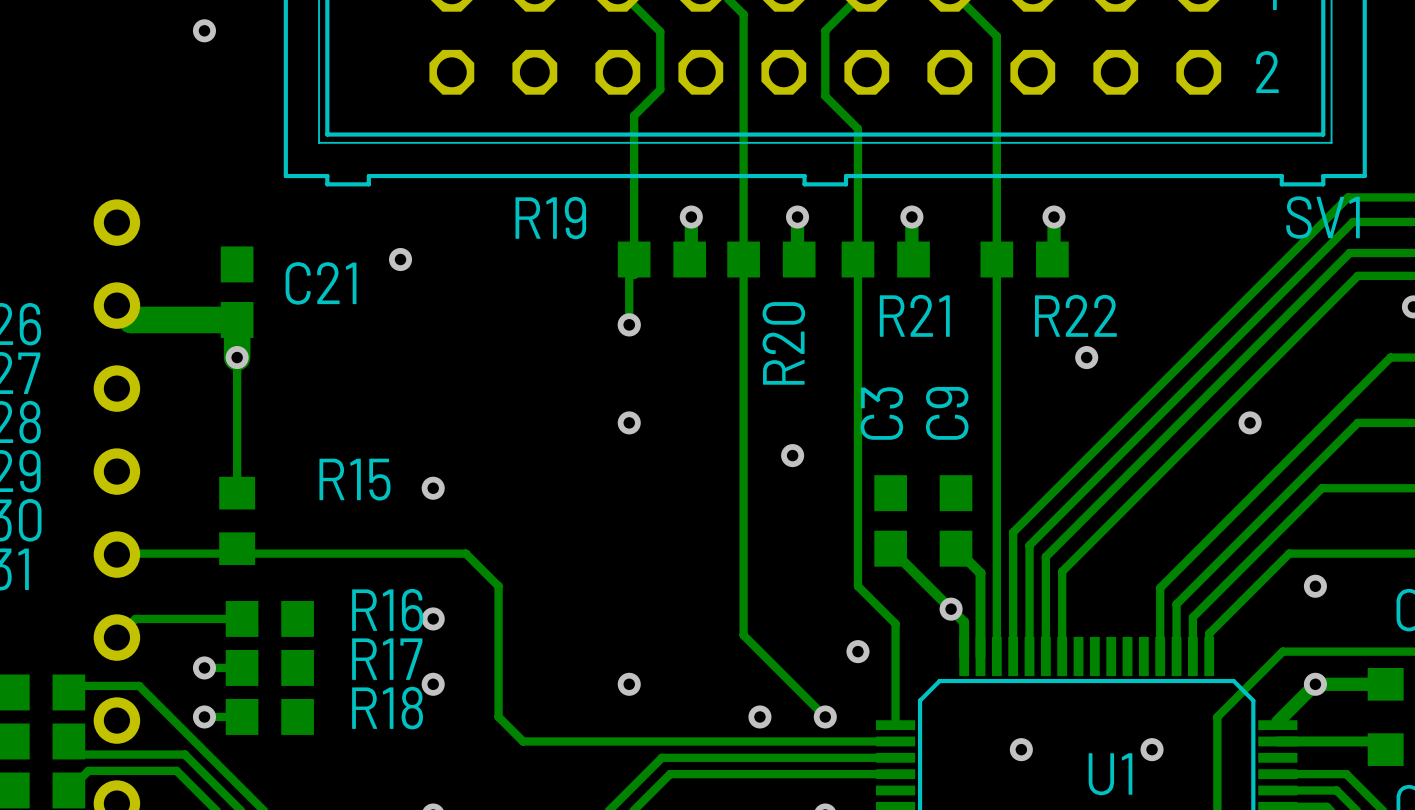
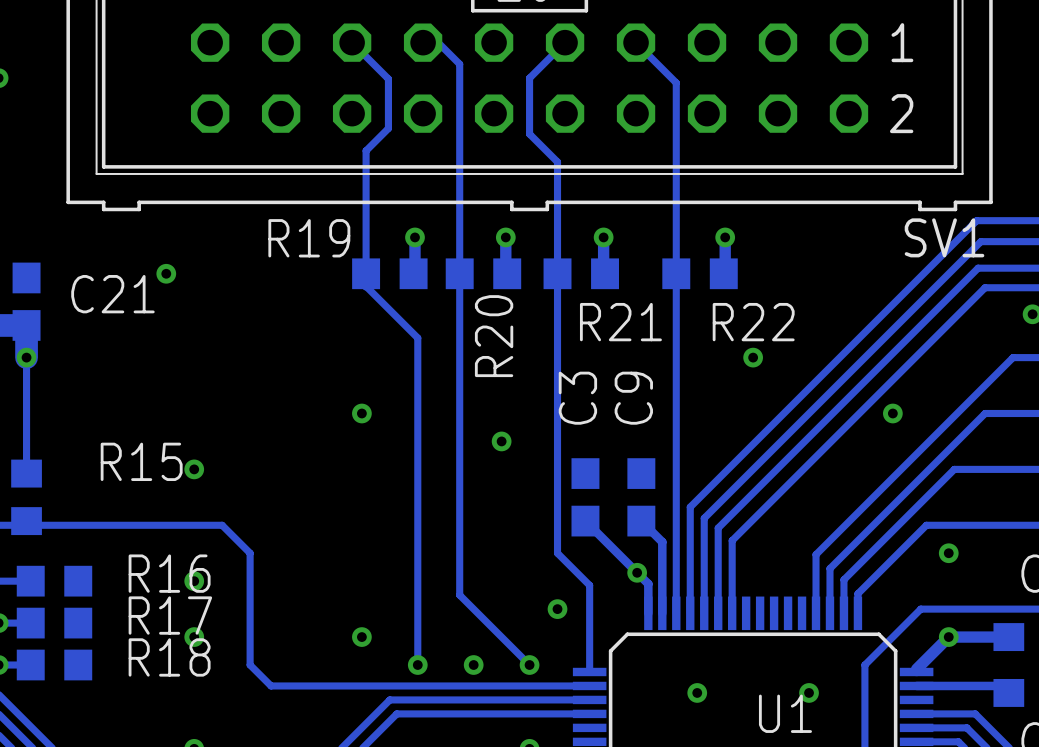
track: (634, 259) (629, 264) (629, 324) -> none
track: none -> (366, 286) (417, 338) (417, 665)
via: (629, 324) -> none
via: none -> (417, 665)

